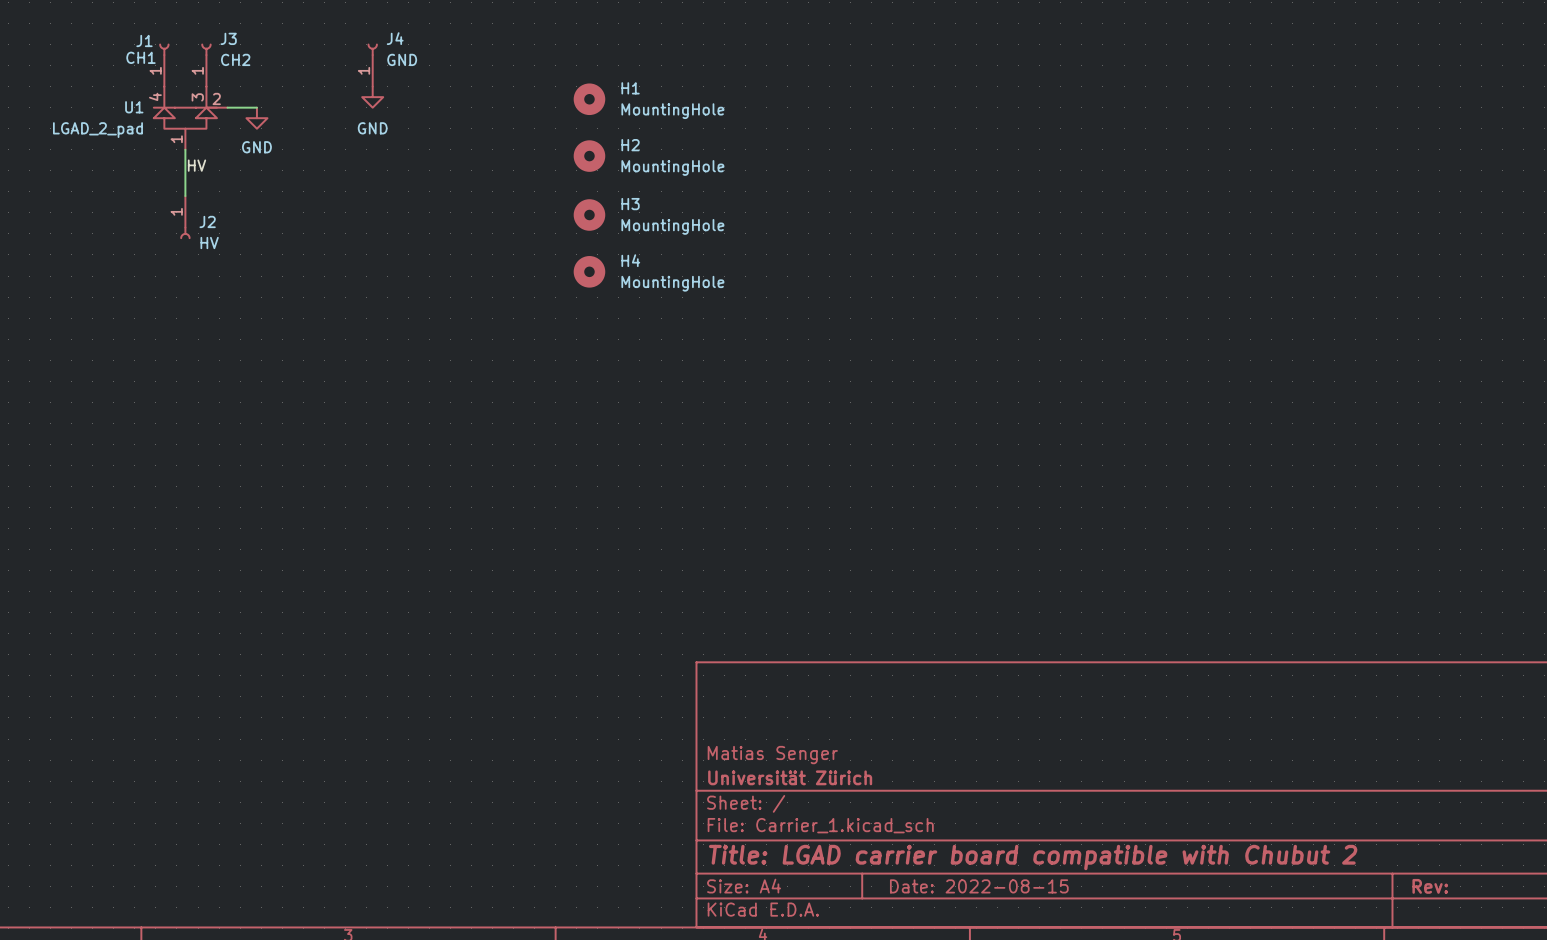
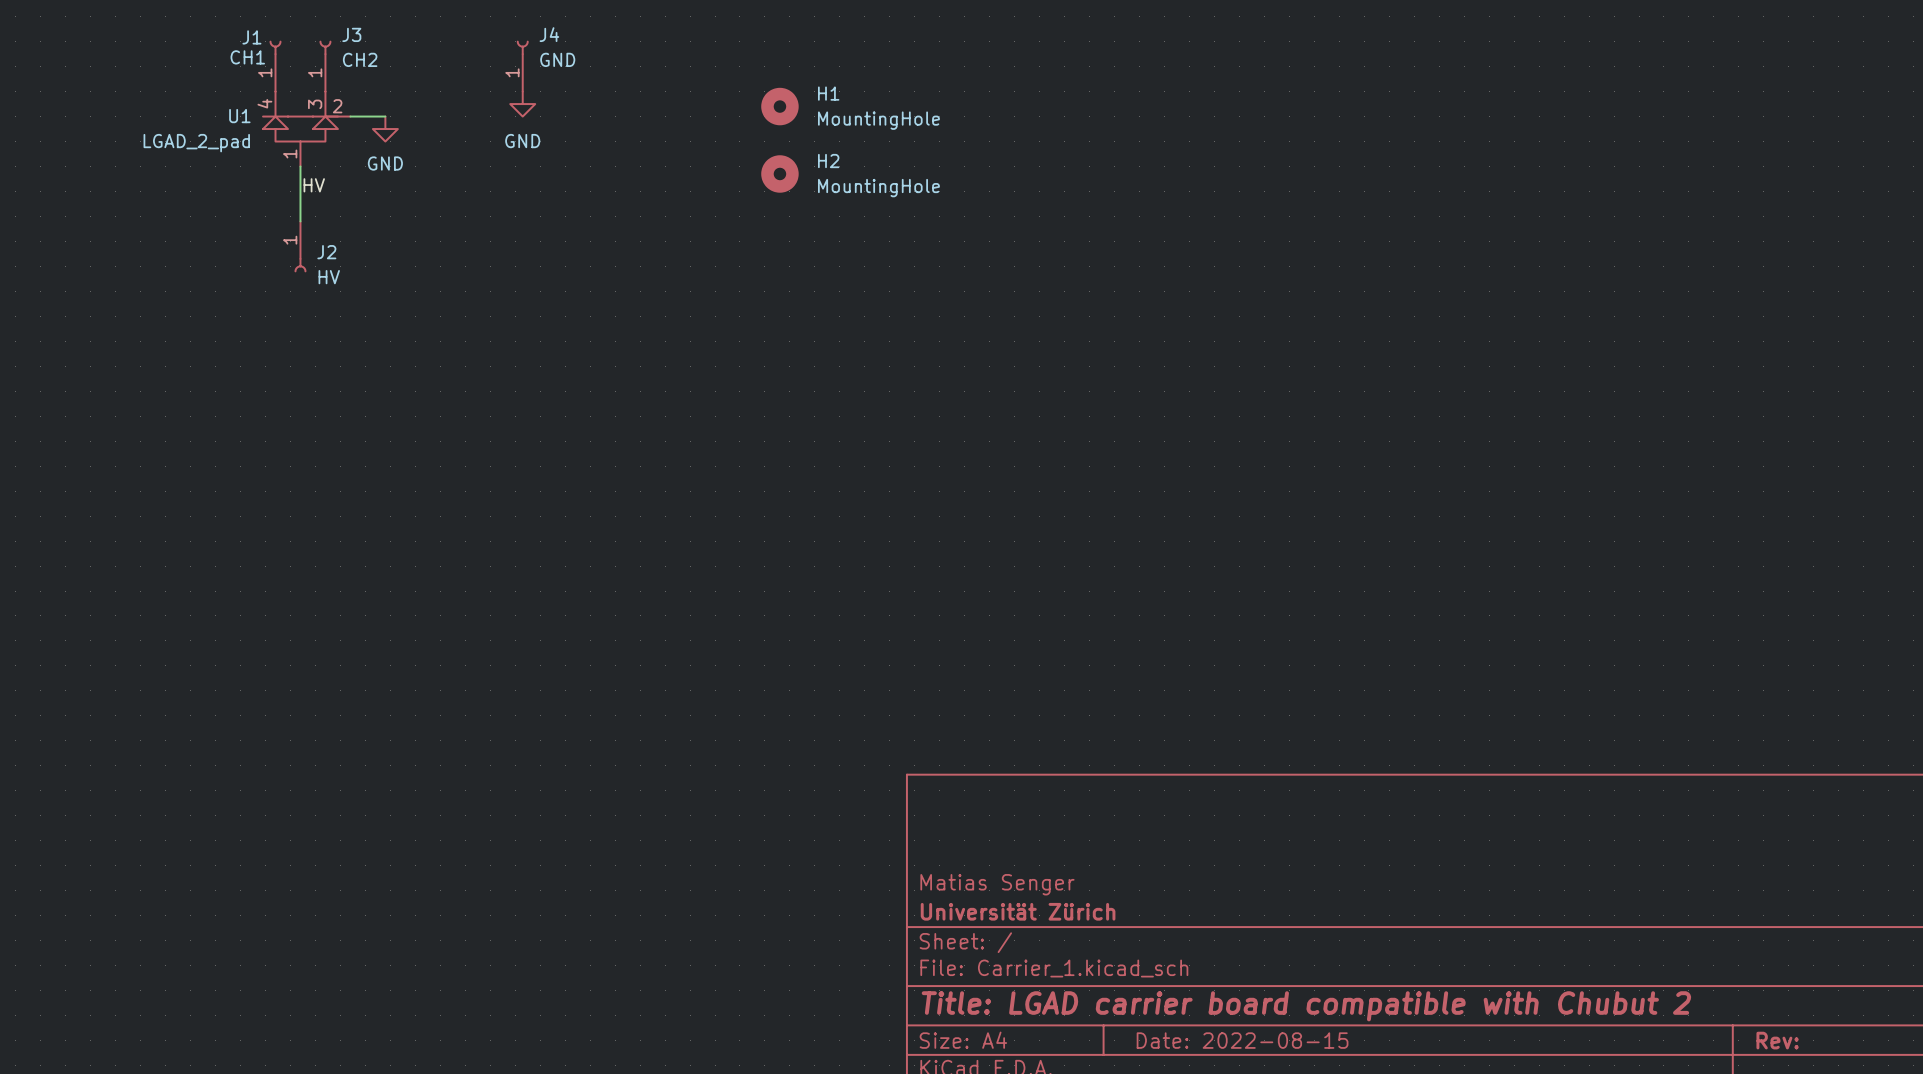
H3: MountingHole (589, 215) -> none
H4: MountingHole (589, 271) -> none

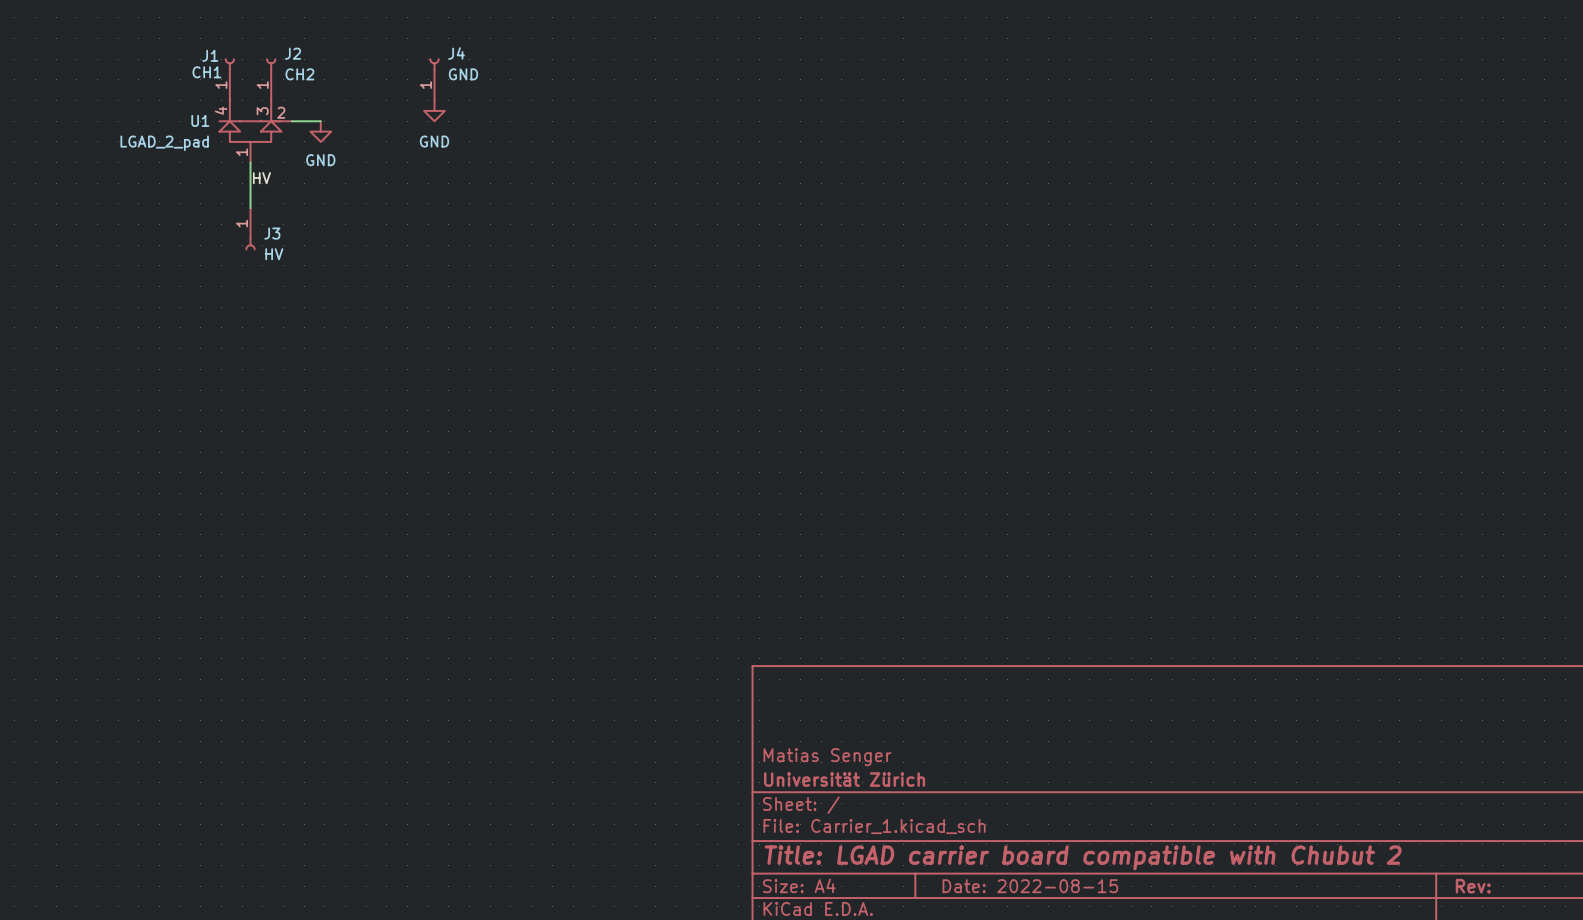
J3 name: J3 (351, 34) -> J2 (293, 53)
H1: MountingHole (779, 106) -> none
H2: MountingHole (779, 173) -> none
J2 name: J2 (326, 252) -> J3 (272, 233)

